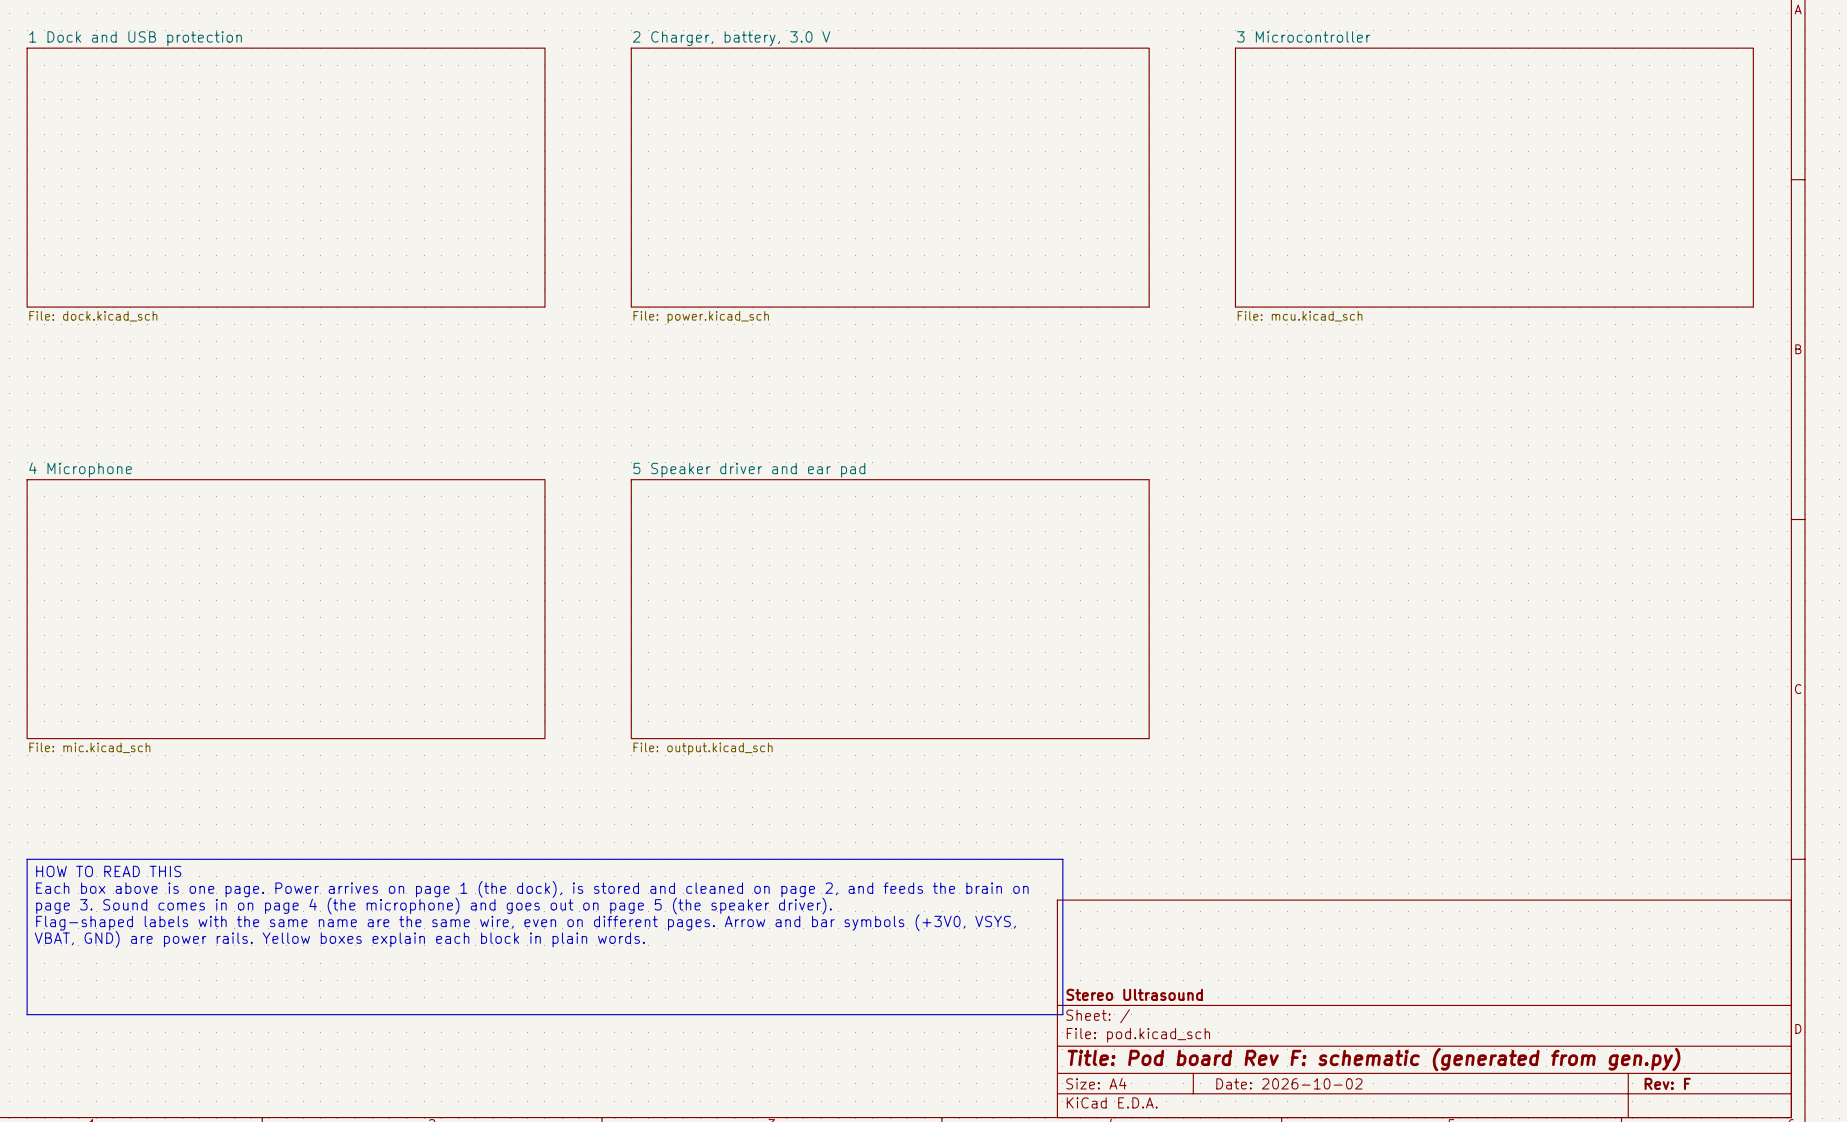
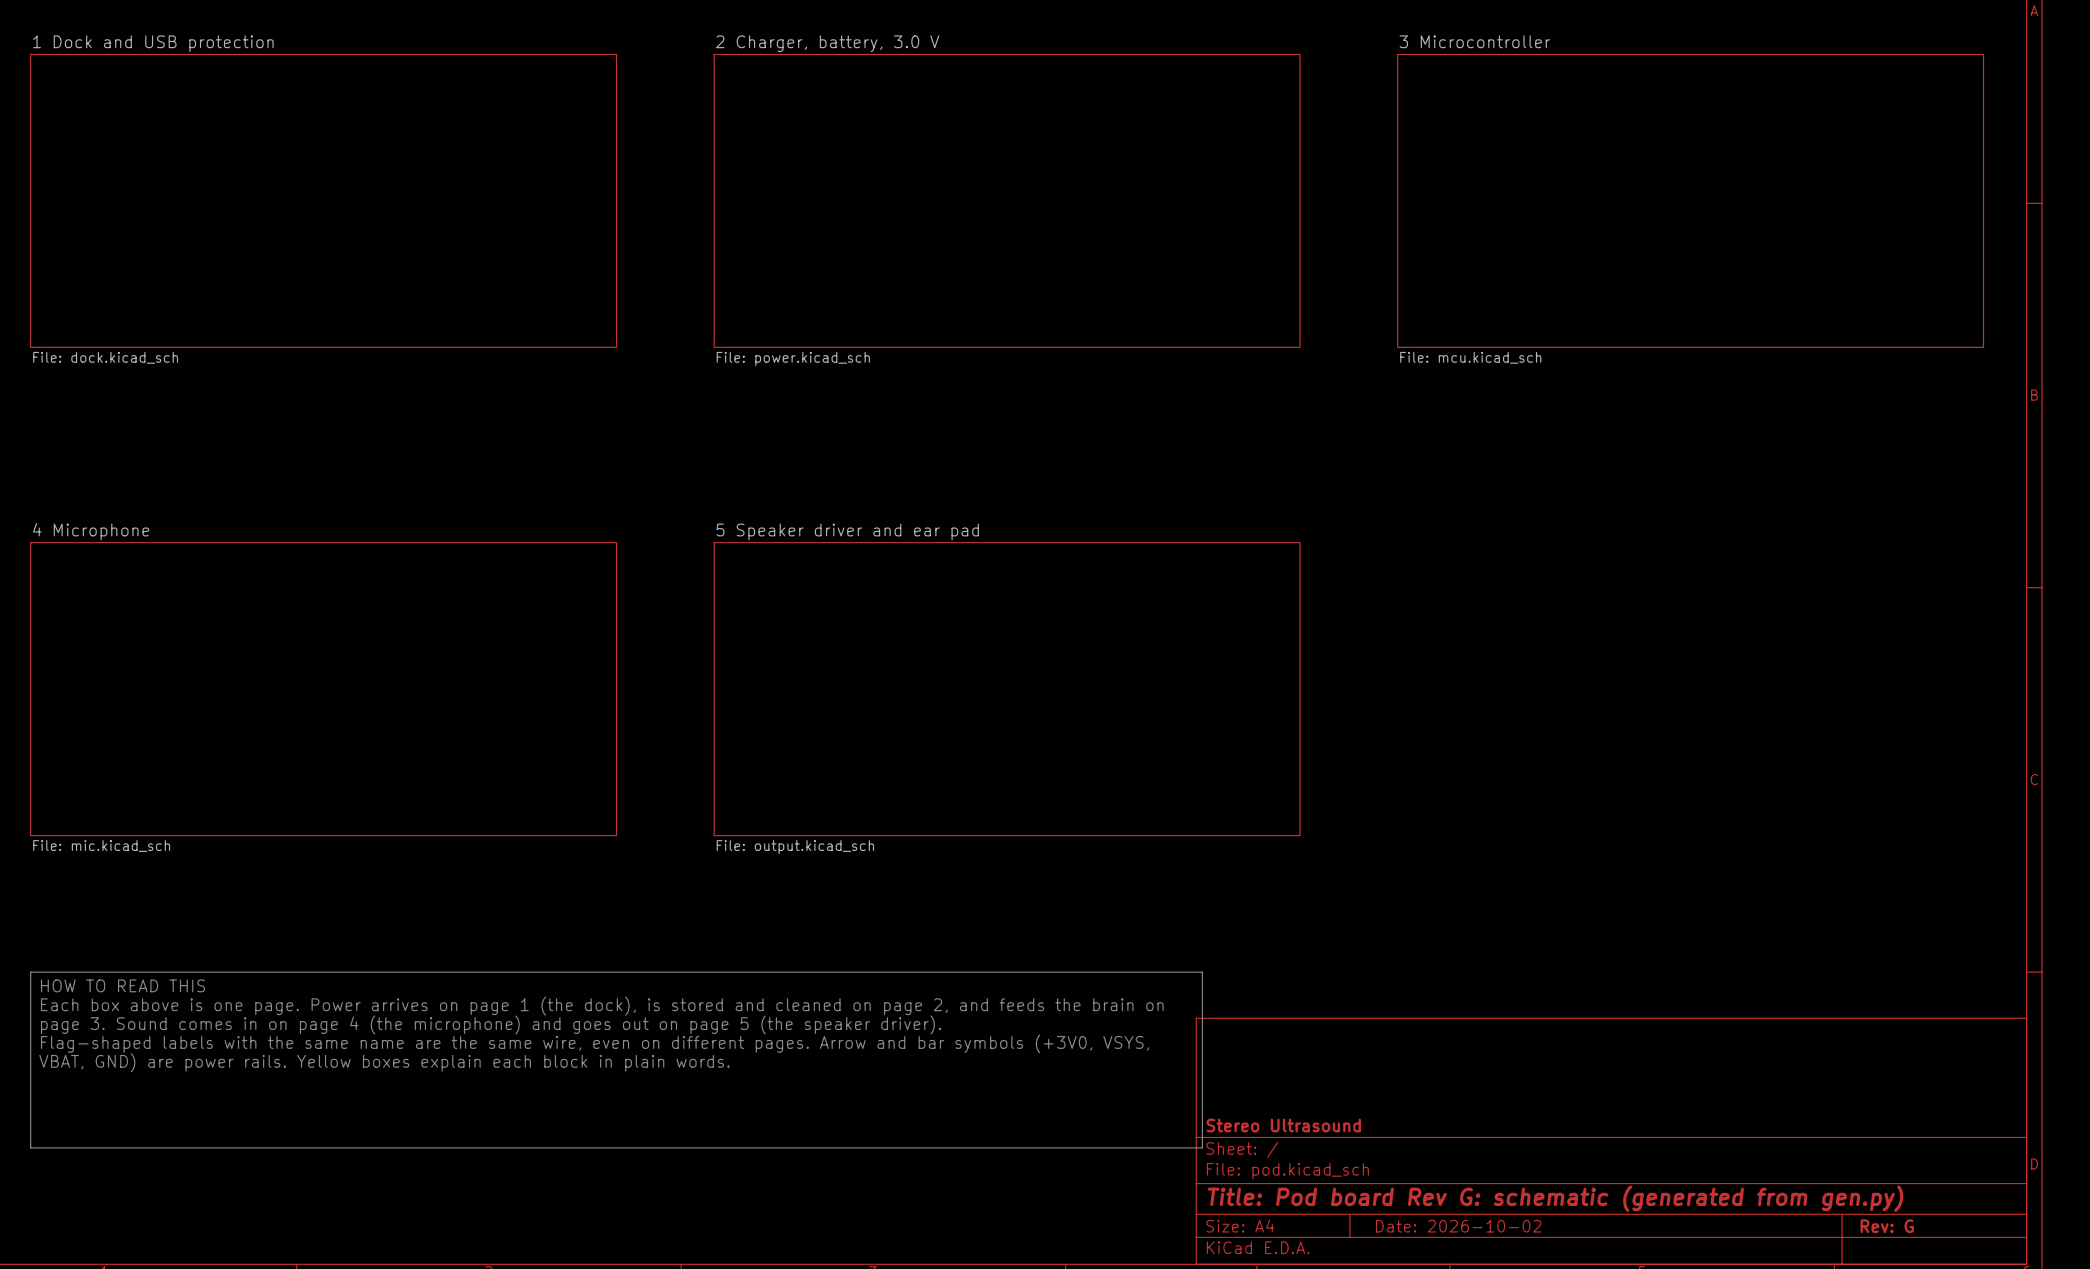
title block: Title: Pod board Rev F: schematic (generated from gen.py) (1374, 1059) -> Title: Pod board Rev G: schematic (generated from gen.py) (1555, 1198)
title block: Rev: F (1667, 1083) -> Rev: G (1887, 1226)

